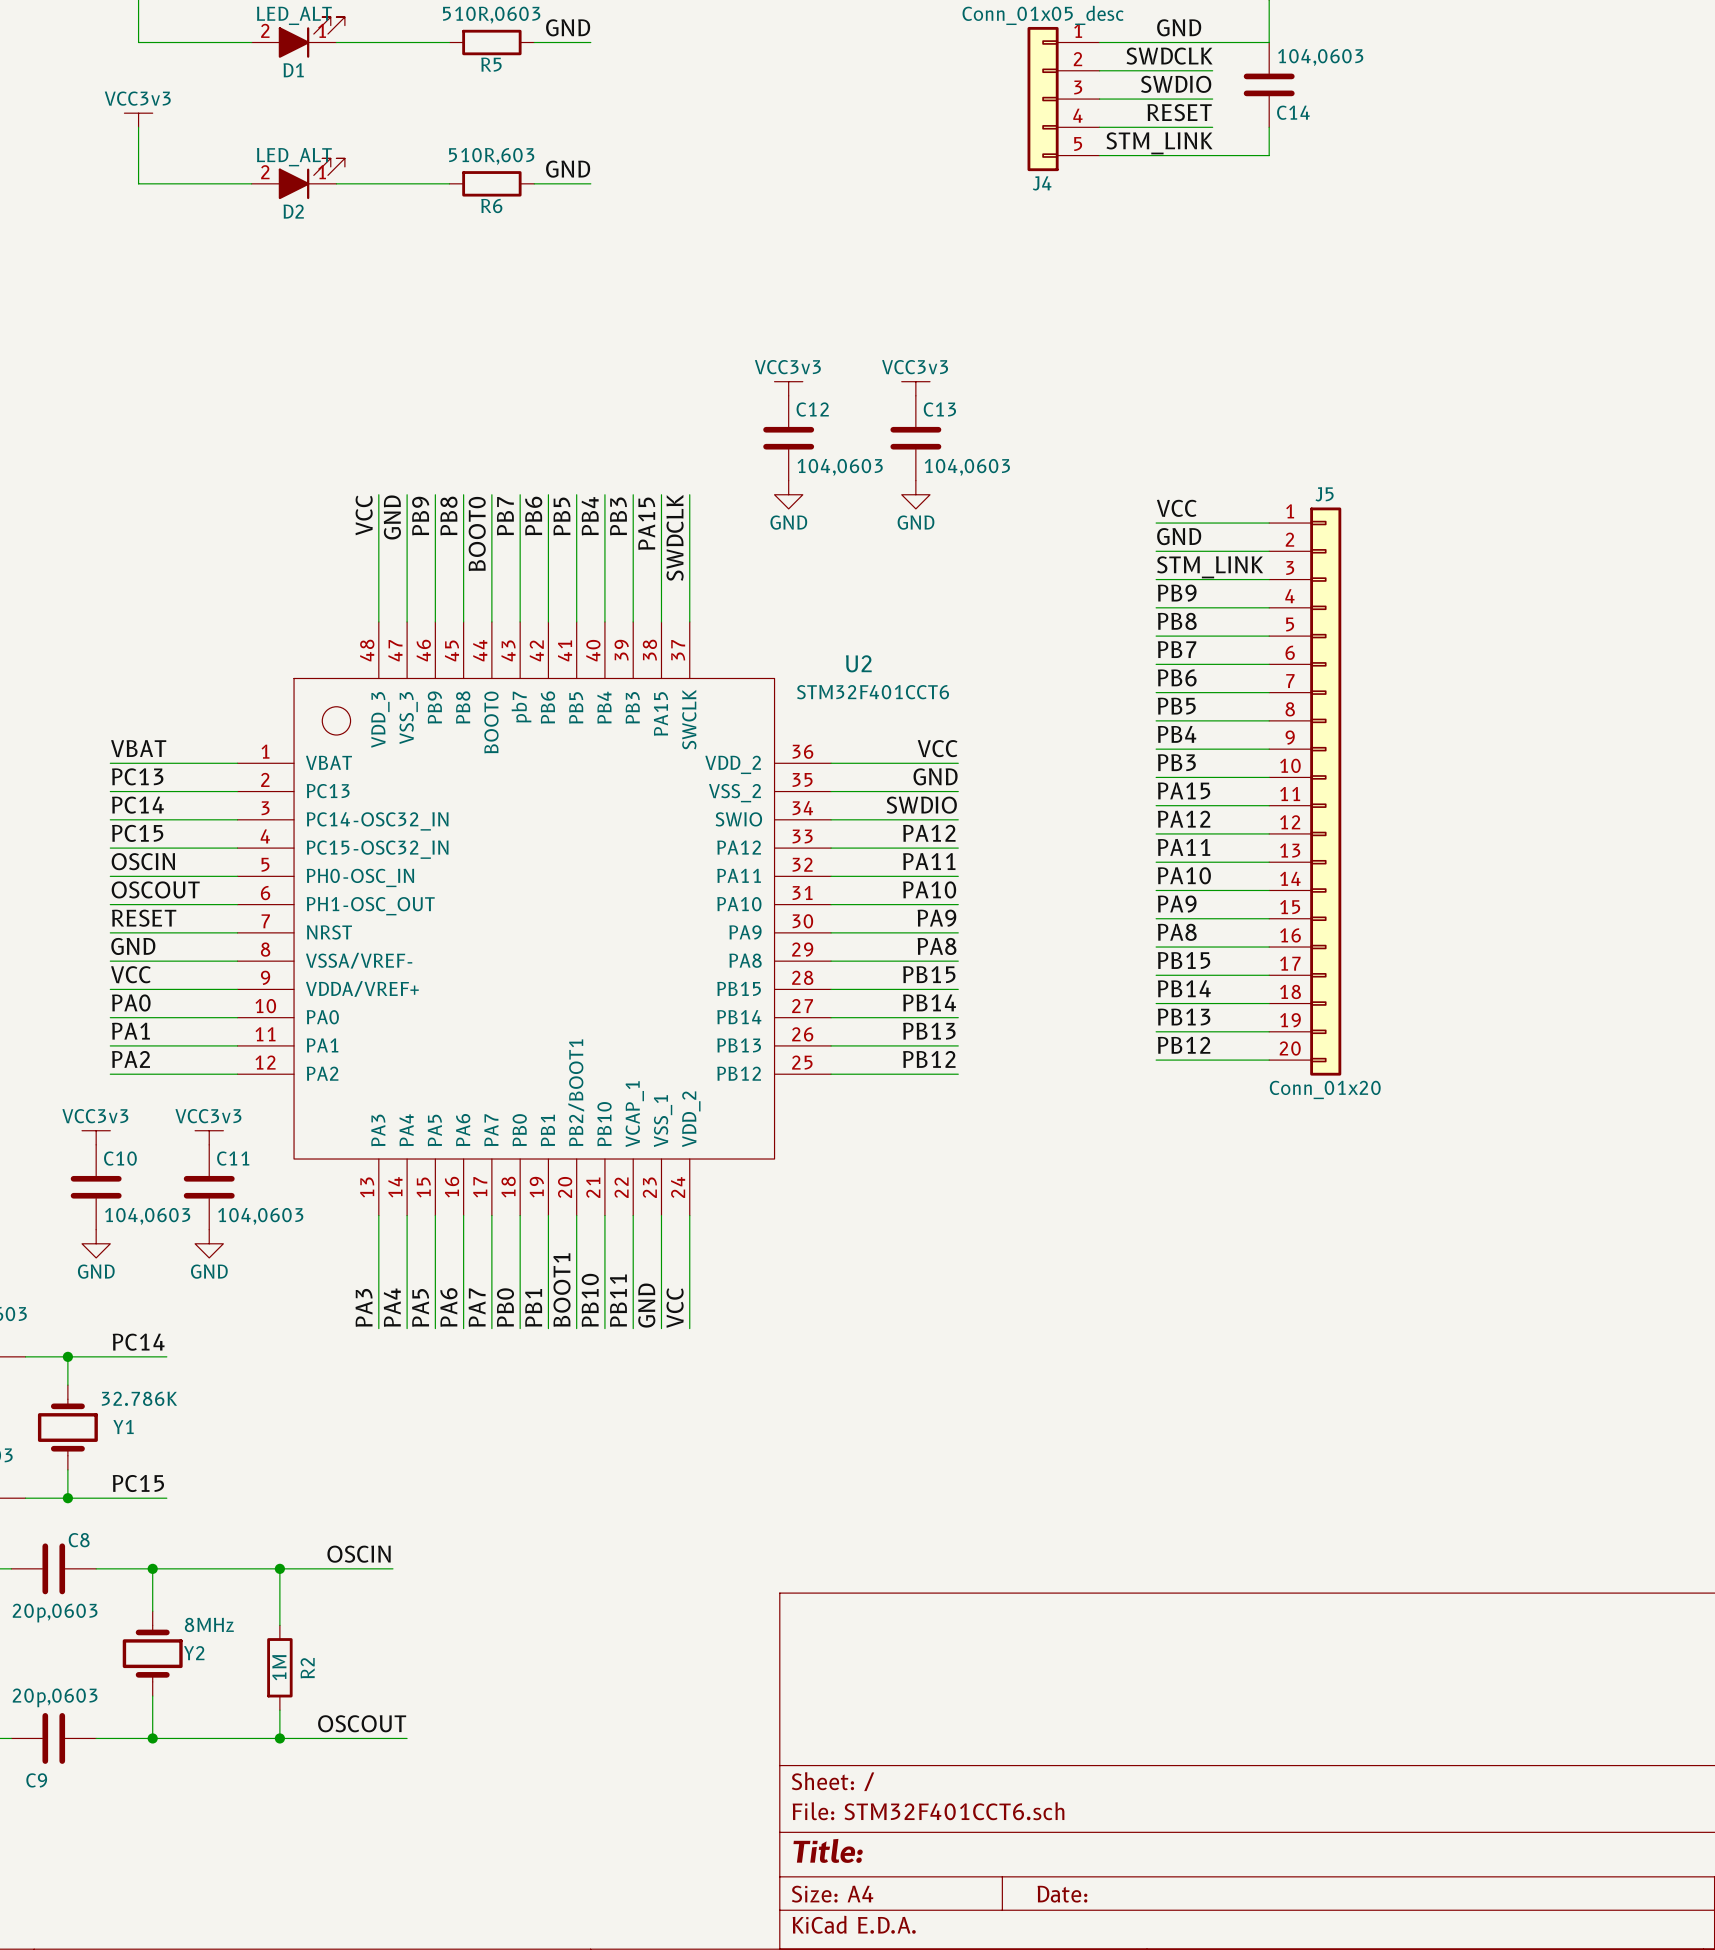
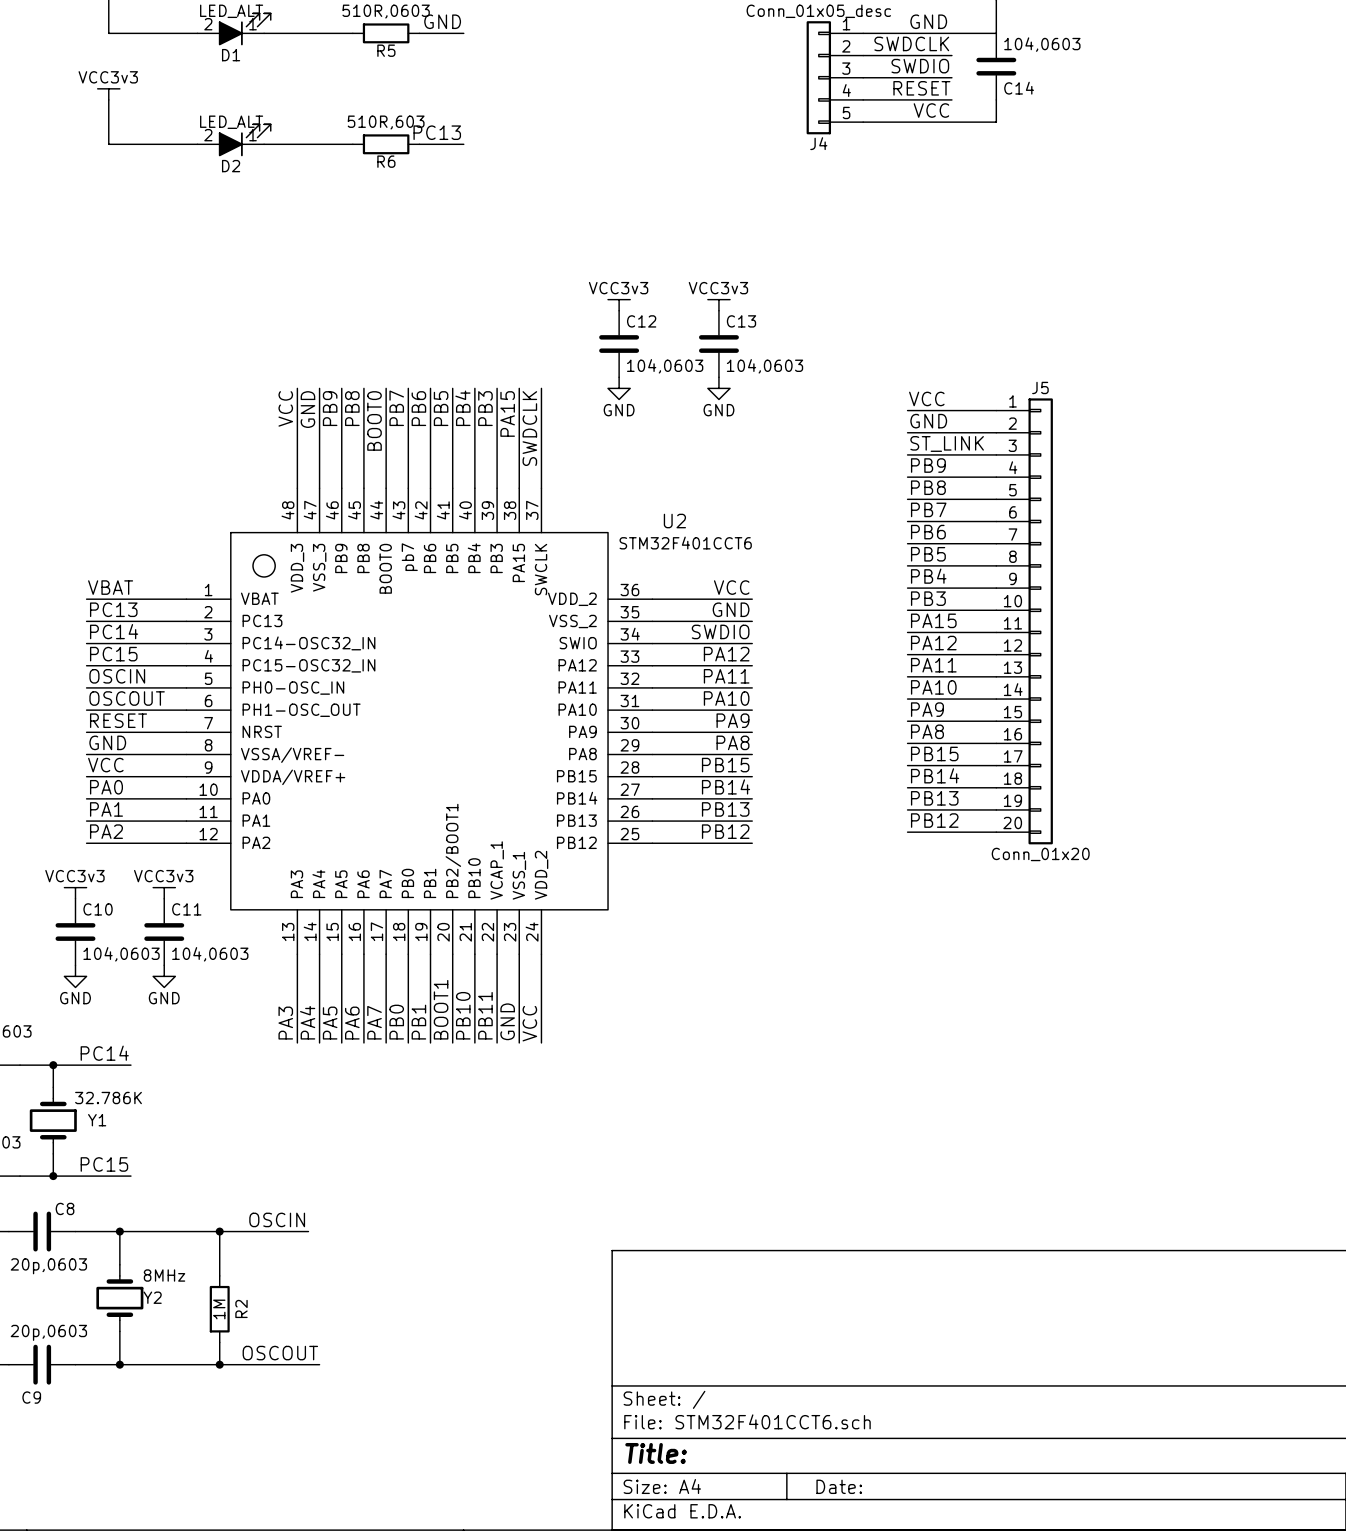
label: STM_LINK (1159, 143) -> VCC (931, 110)
label: GND (568, 169) -> PC13 (437, 132)
label: STM_LINK (1210, 567) -> ST_LINK (947, 443)

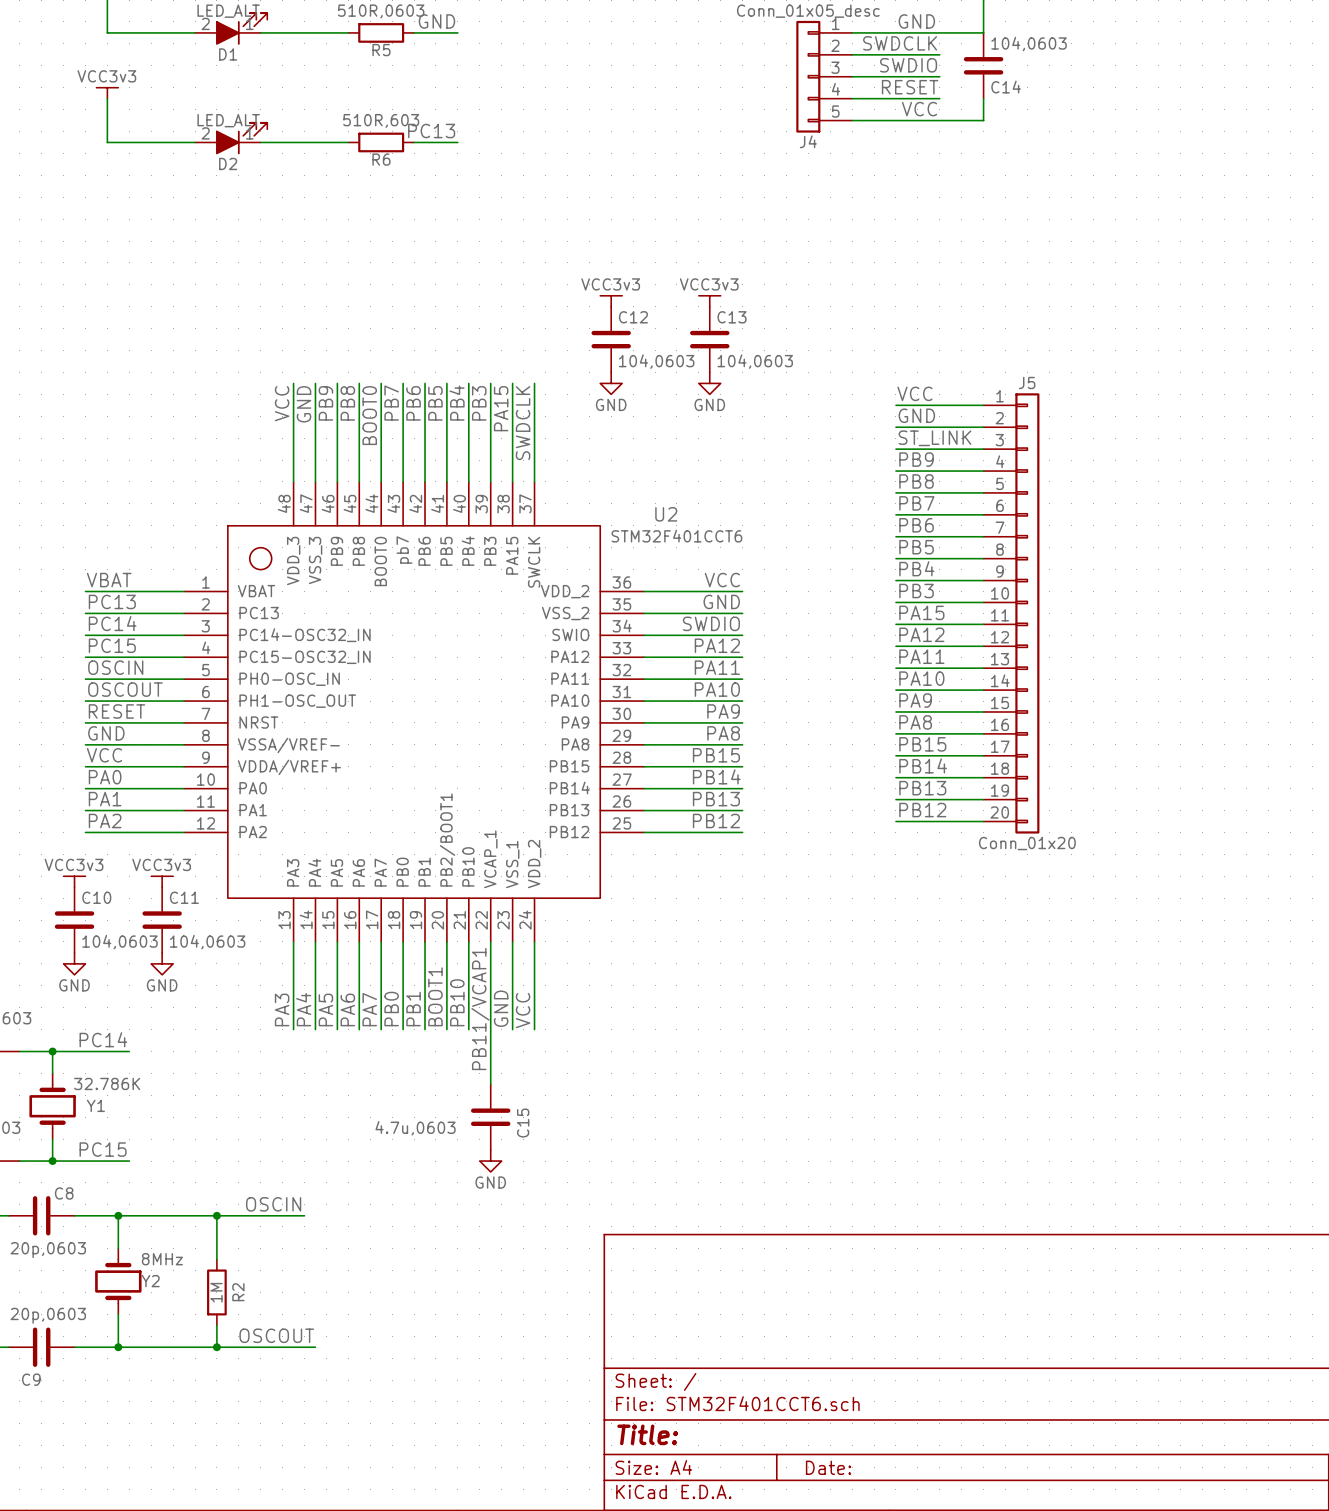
label: PB11 (485, 1015) -> none
label: none -> PB11/VCAP1 (480, 1009)
wire: none -> (490, 1029) (490, 1084)
C15: none -> 4.7u,0603 (490, 1117)
power symbol: none -> GND (490, 1161)

